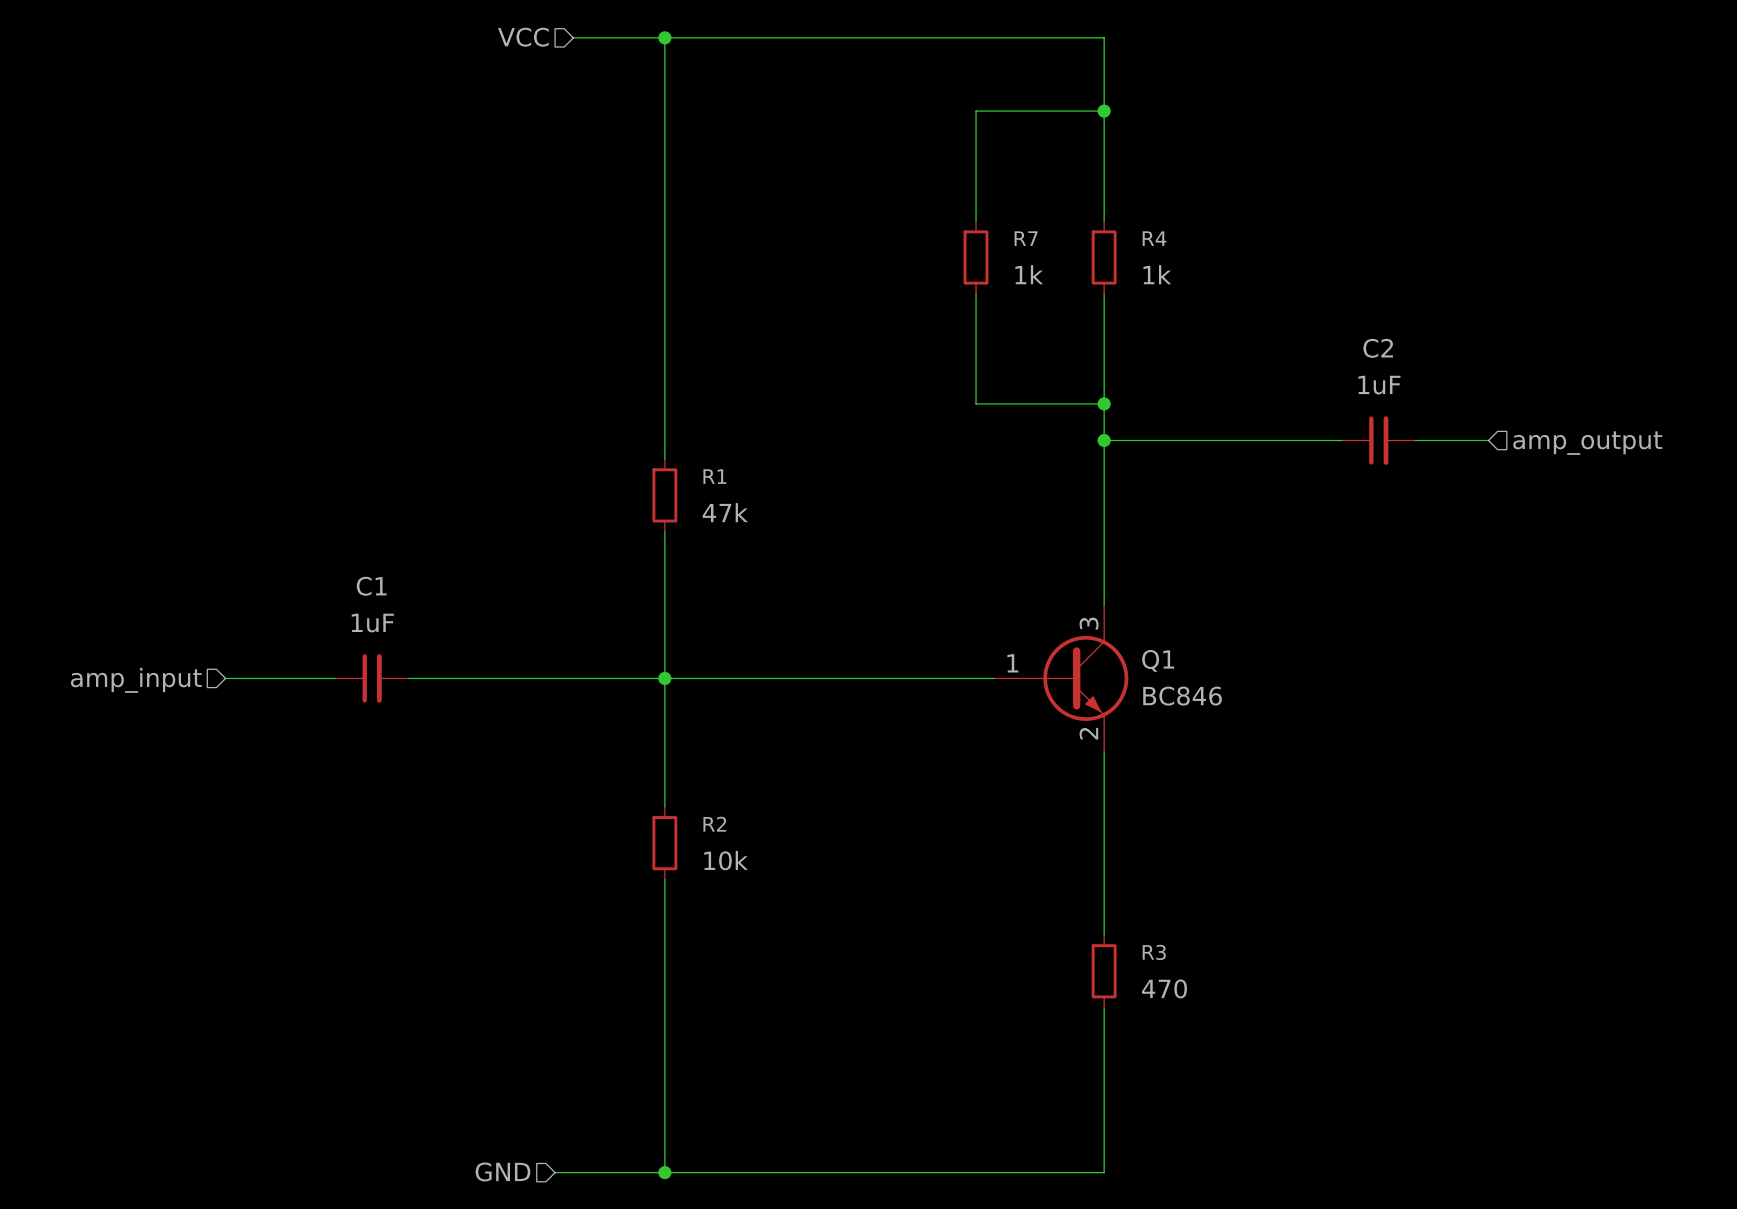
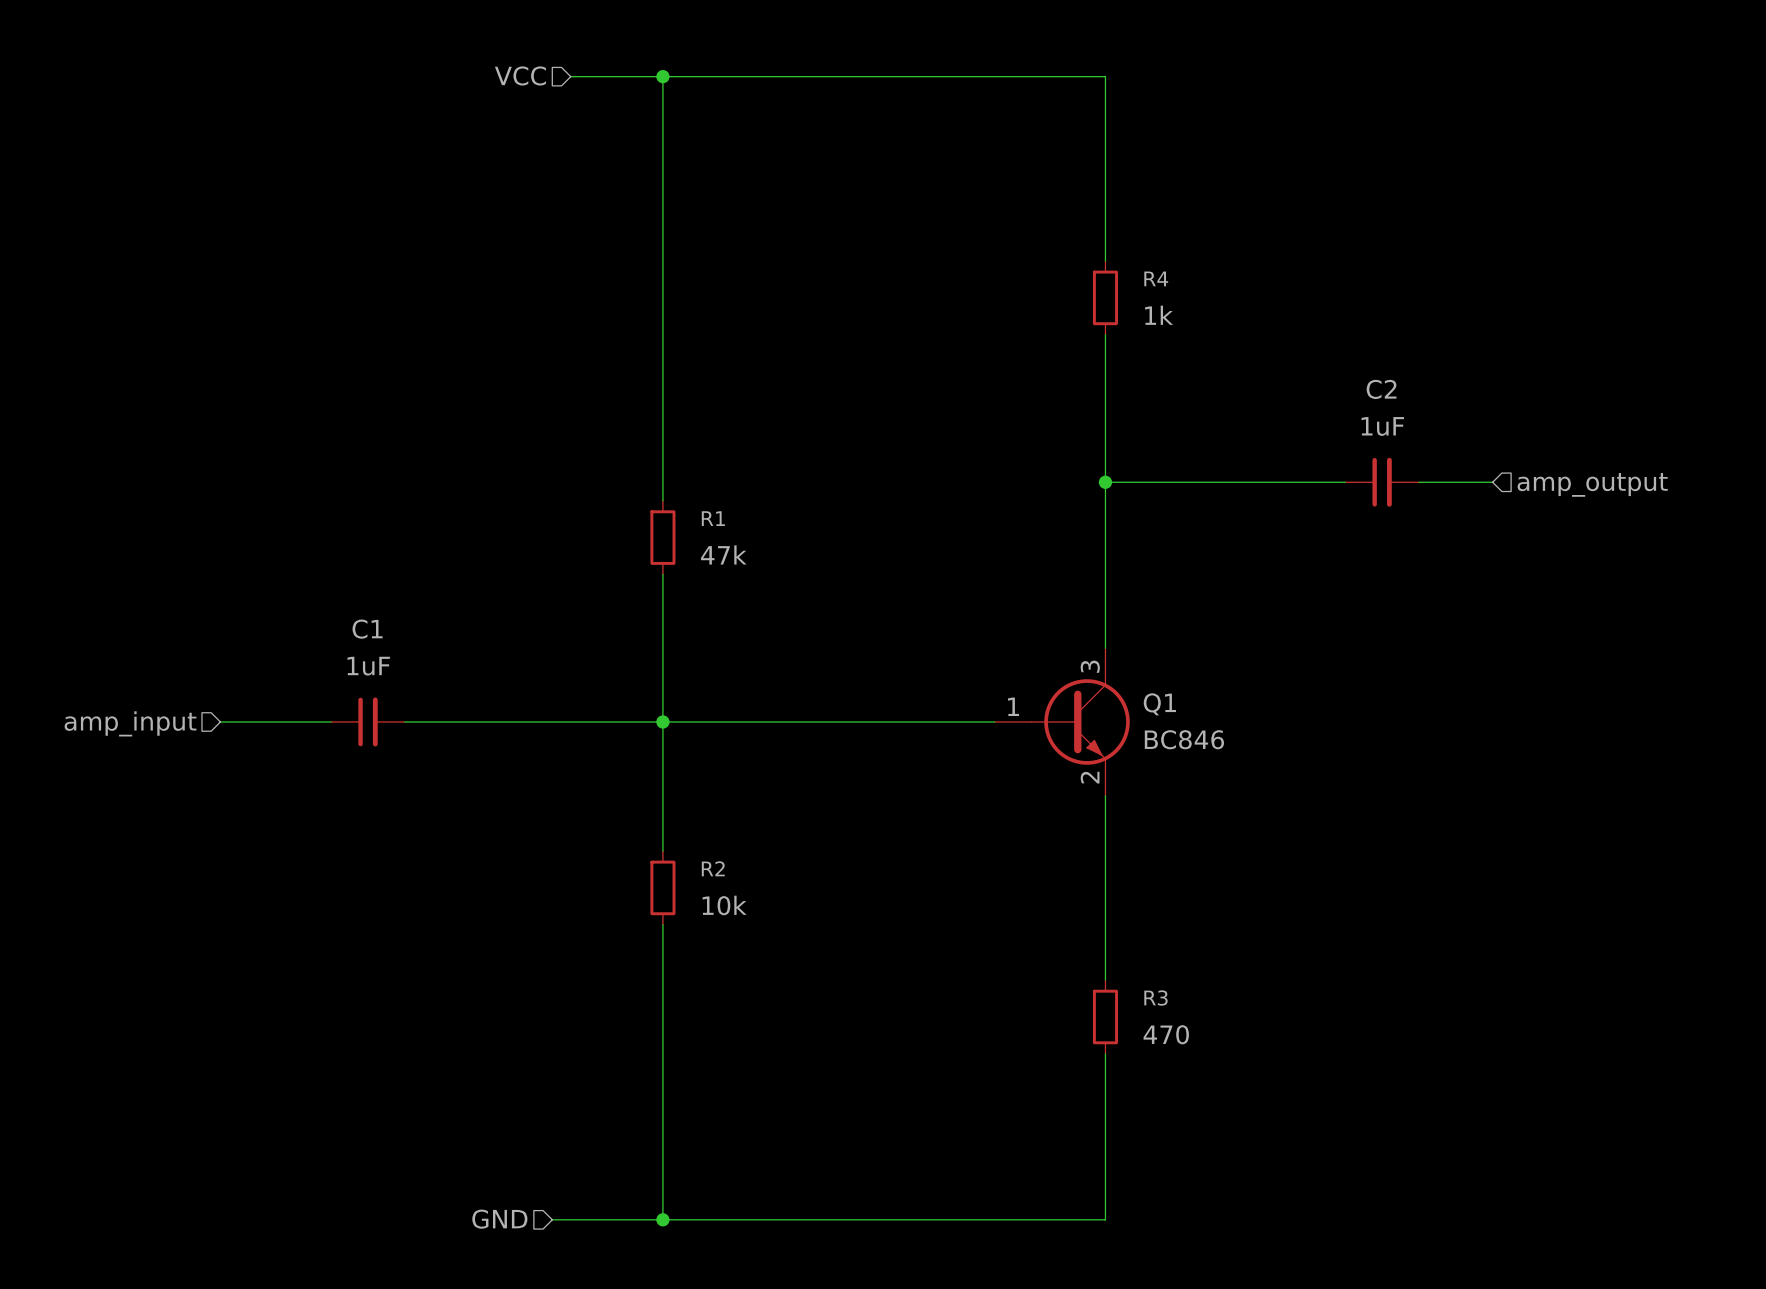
wire: (1104, 111) (976, 111) (976, 220) -> none
junction: (1104, 111) -> none
R7: 1k (976, 257) -> none
wire: (976, 294) (976, 403) (1104, 403) -> none
junction: (1104, 403) -> none

